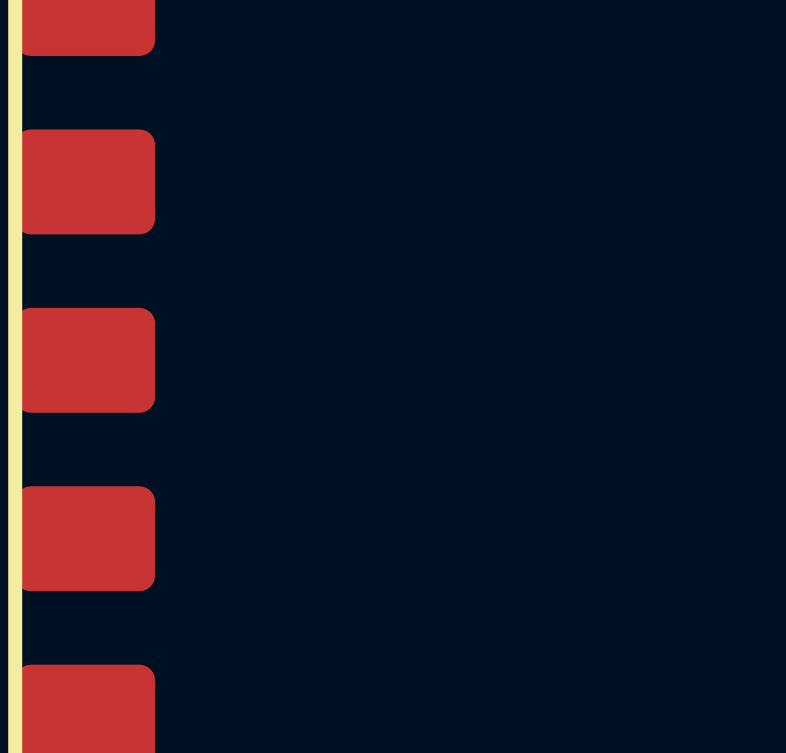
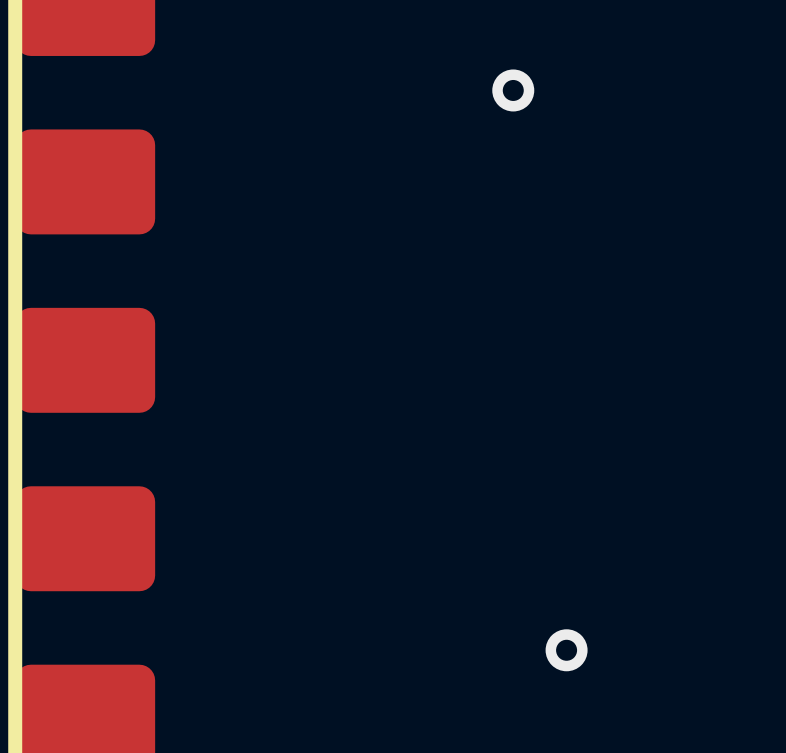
via: none -> (513, 90)
via: none -> (566, 650)

